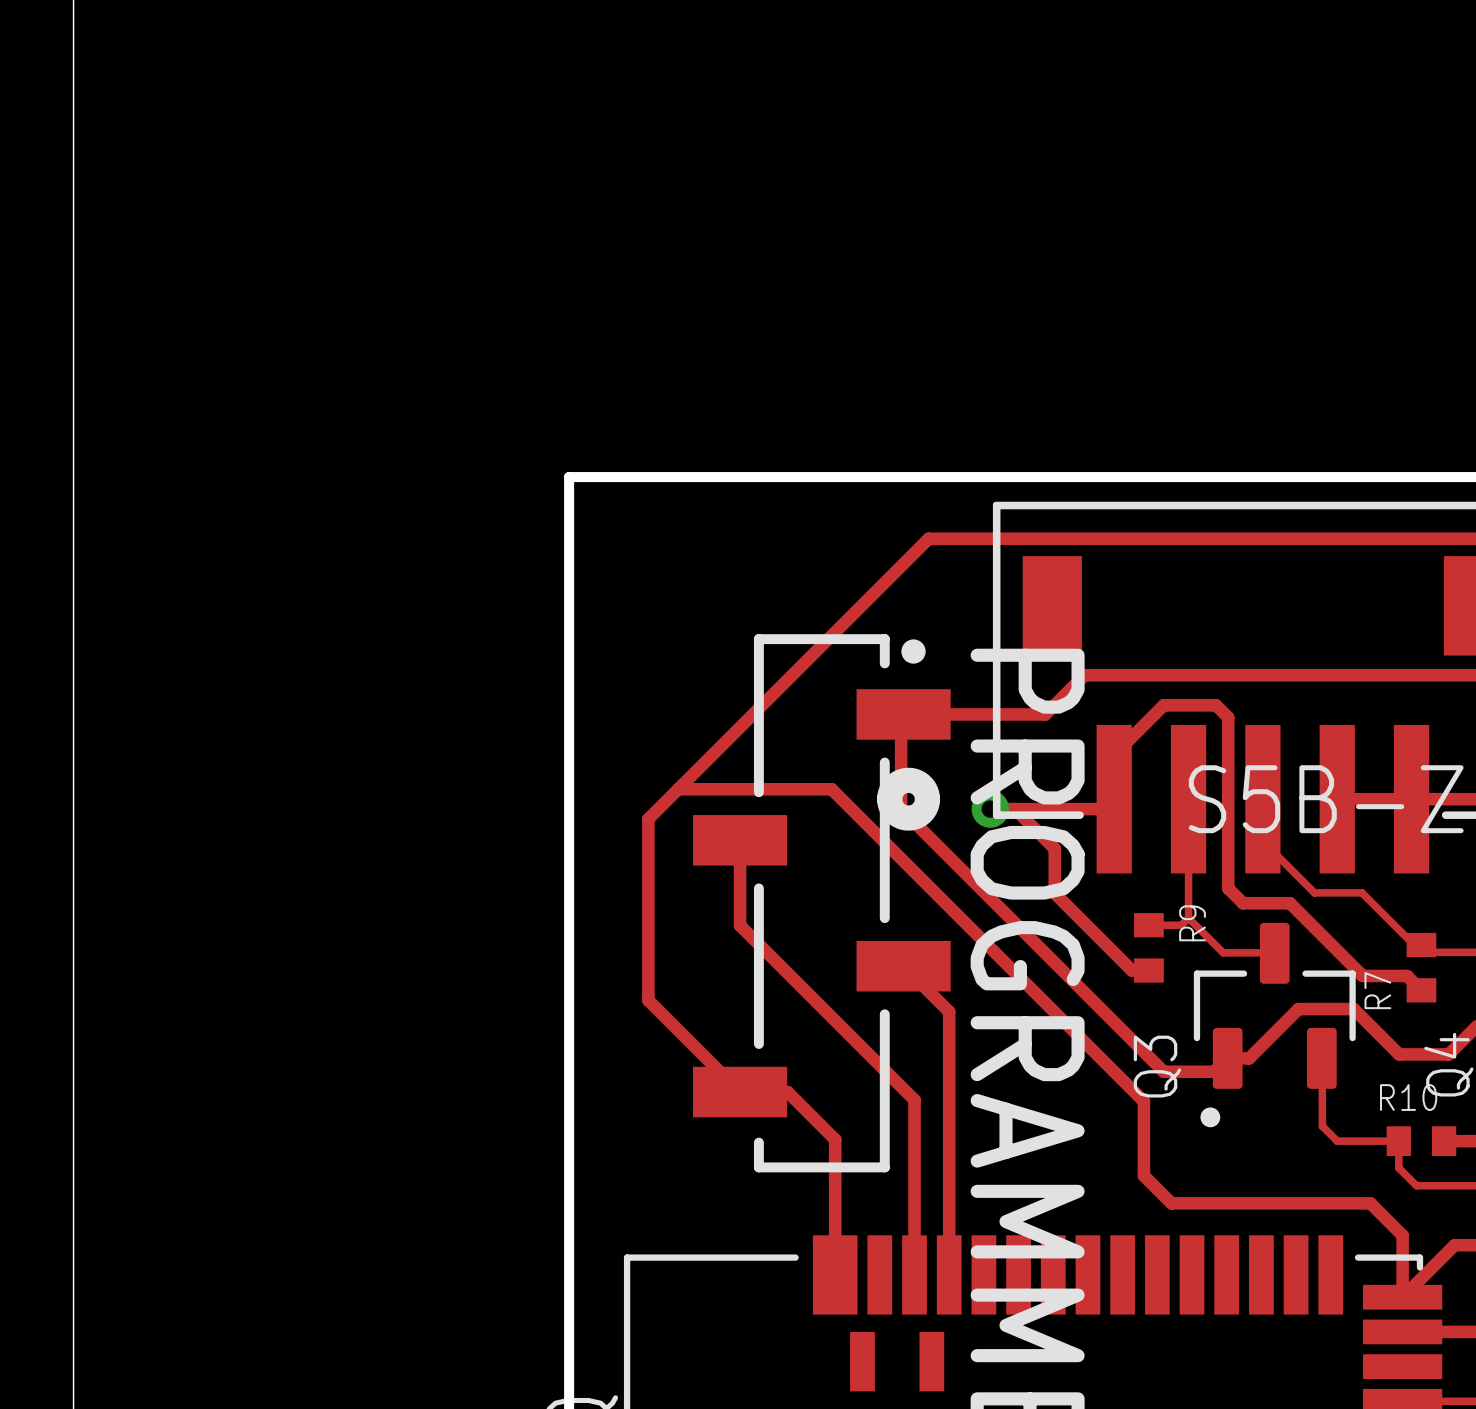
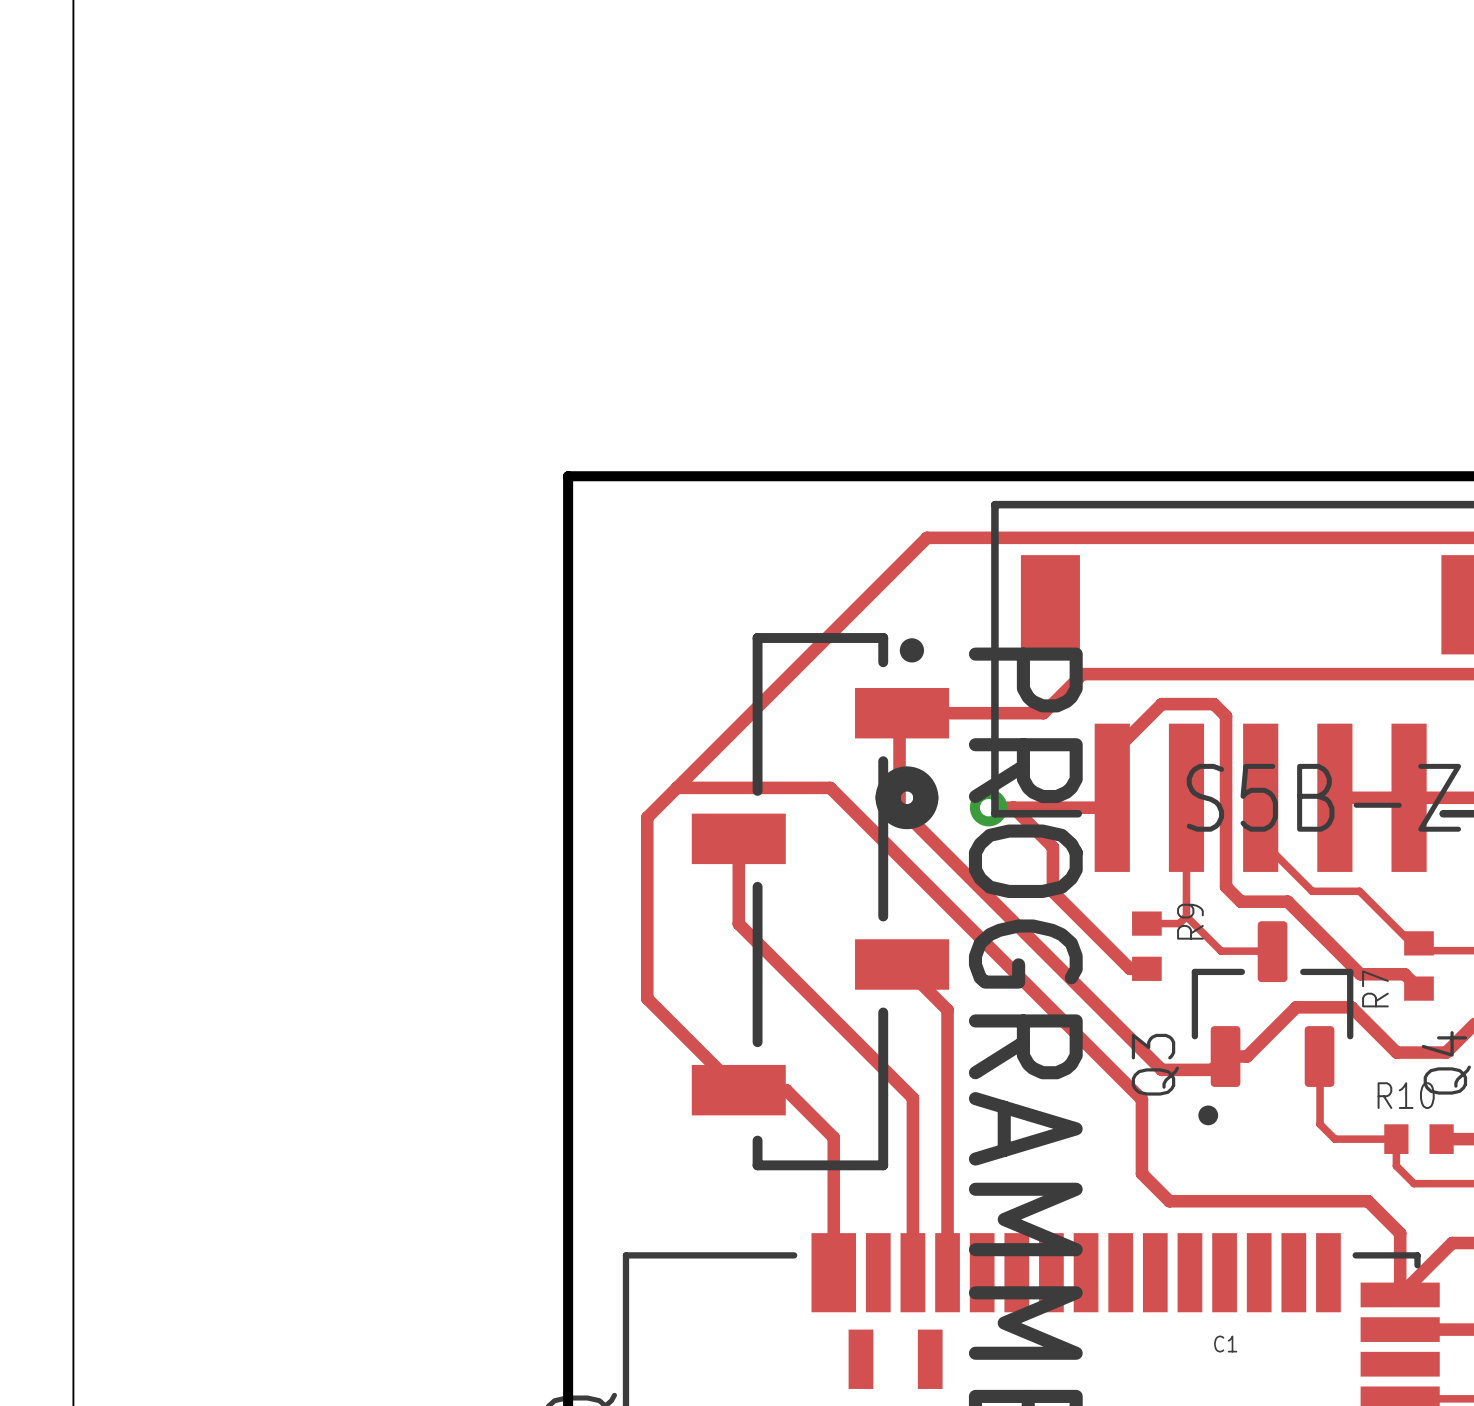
C1: none -> (1225, 1344)

